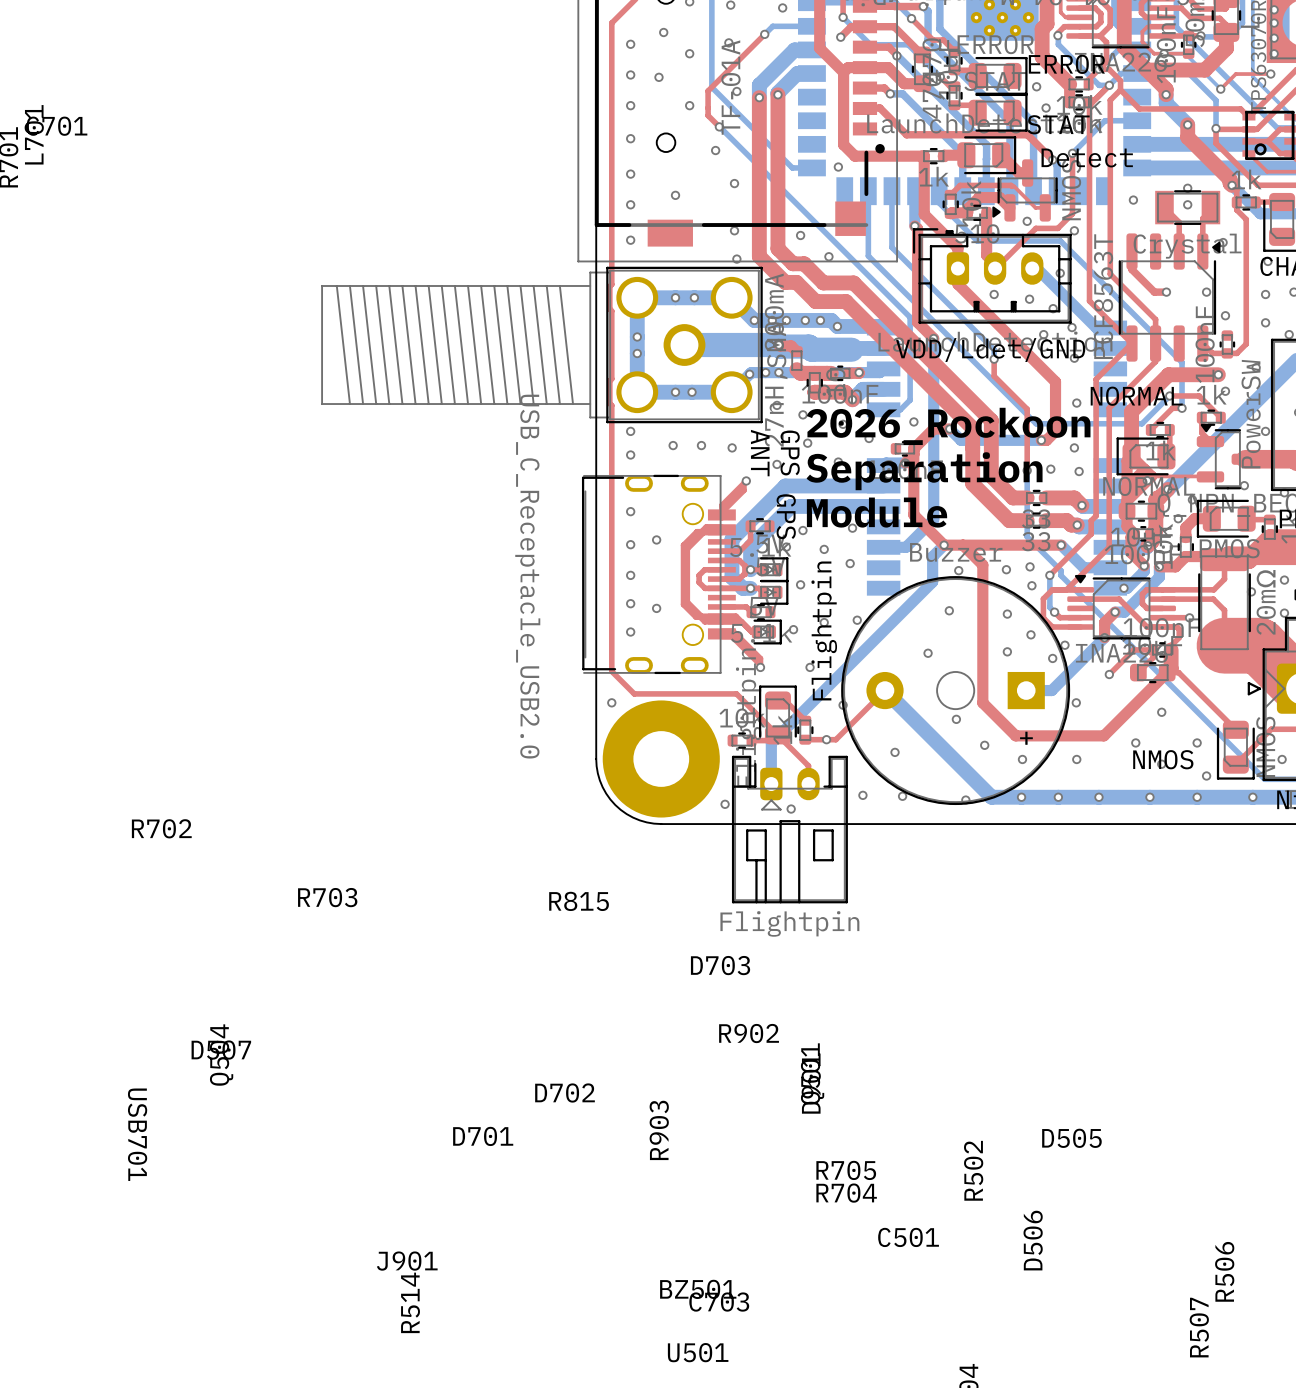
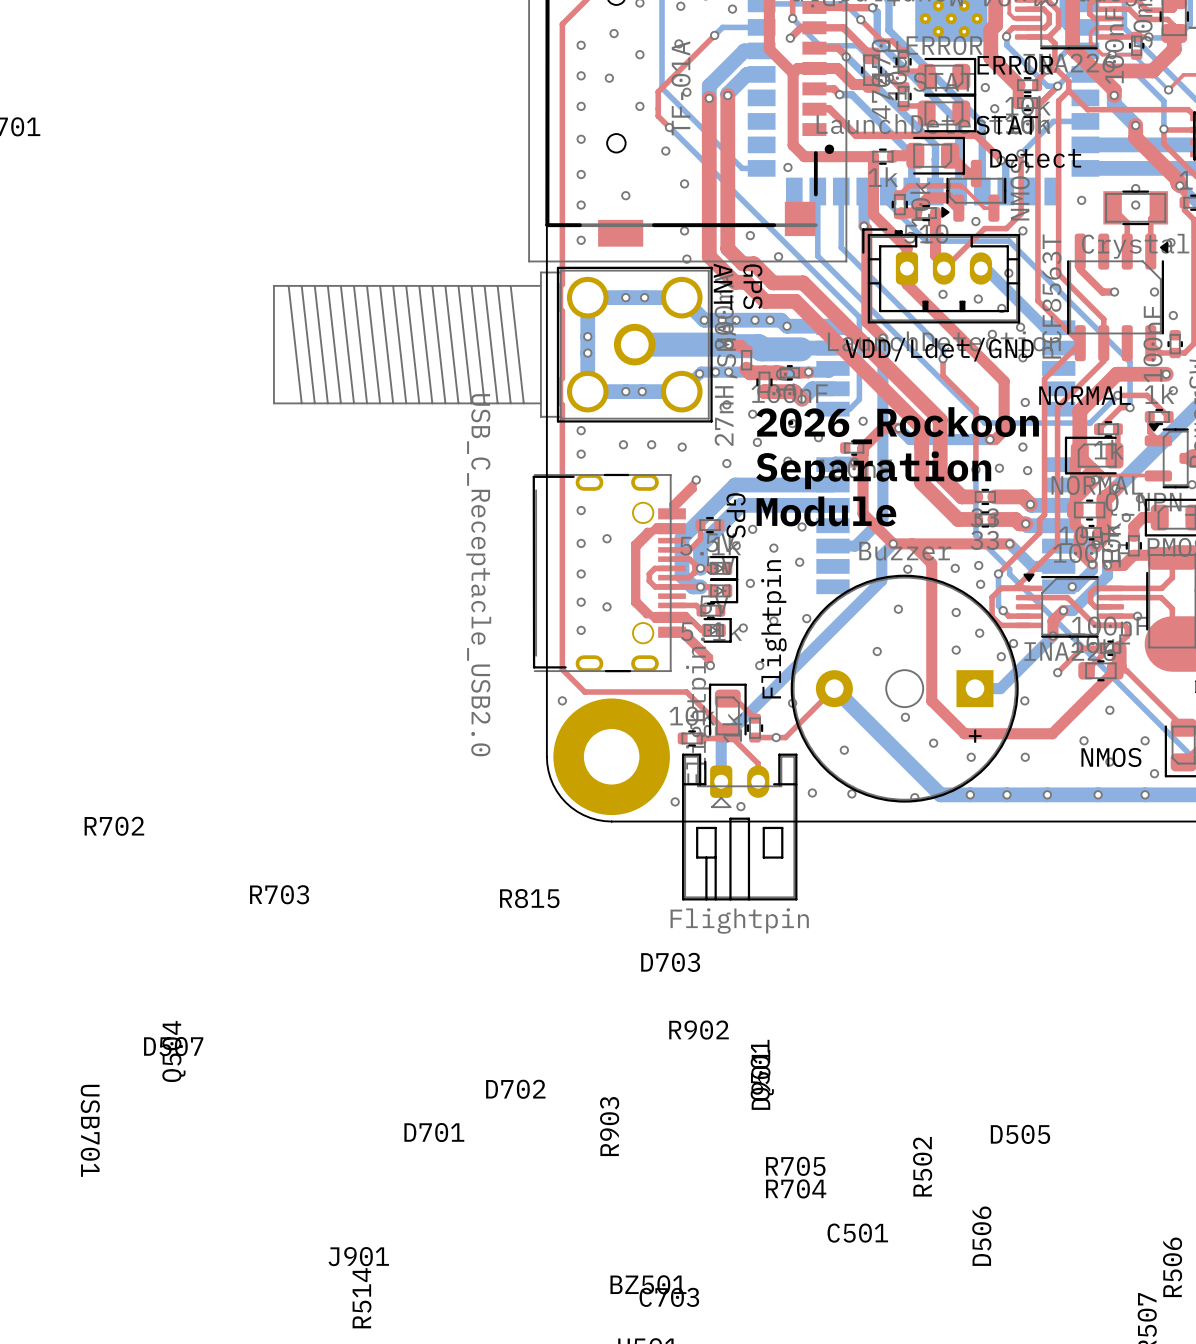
text position: GPS (790, 452) -> GPS (752, 286)
text position: ANT (760, 453) -> ANT (723, 286)

